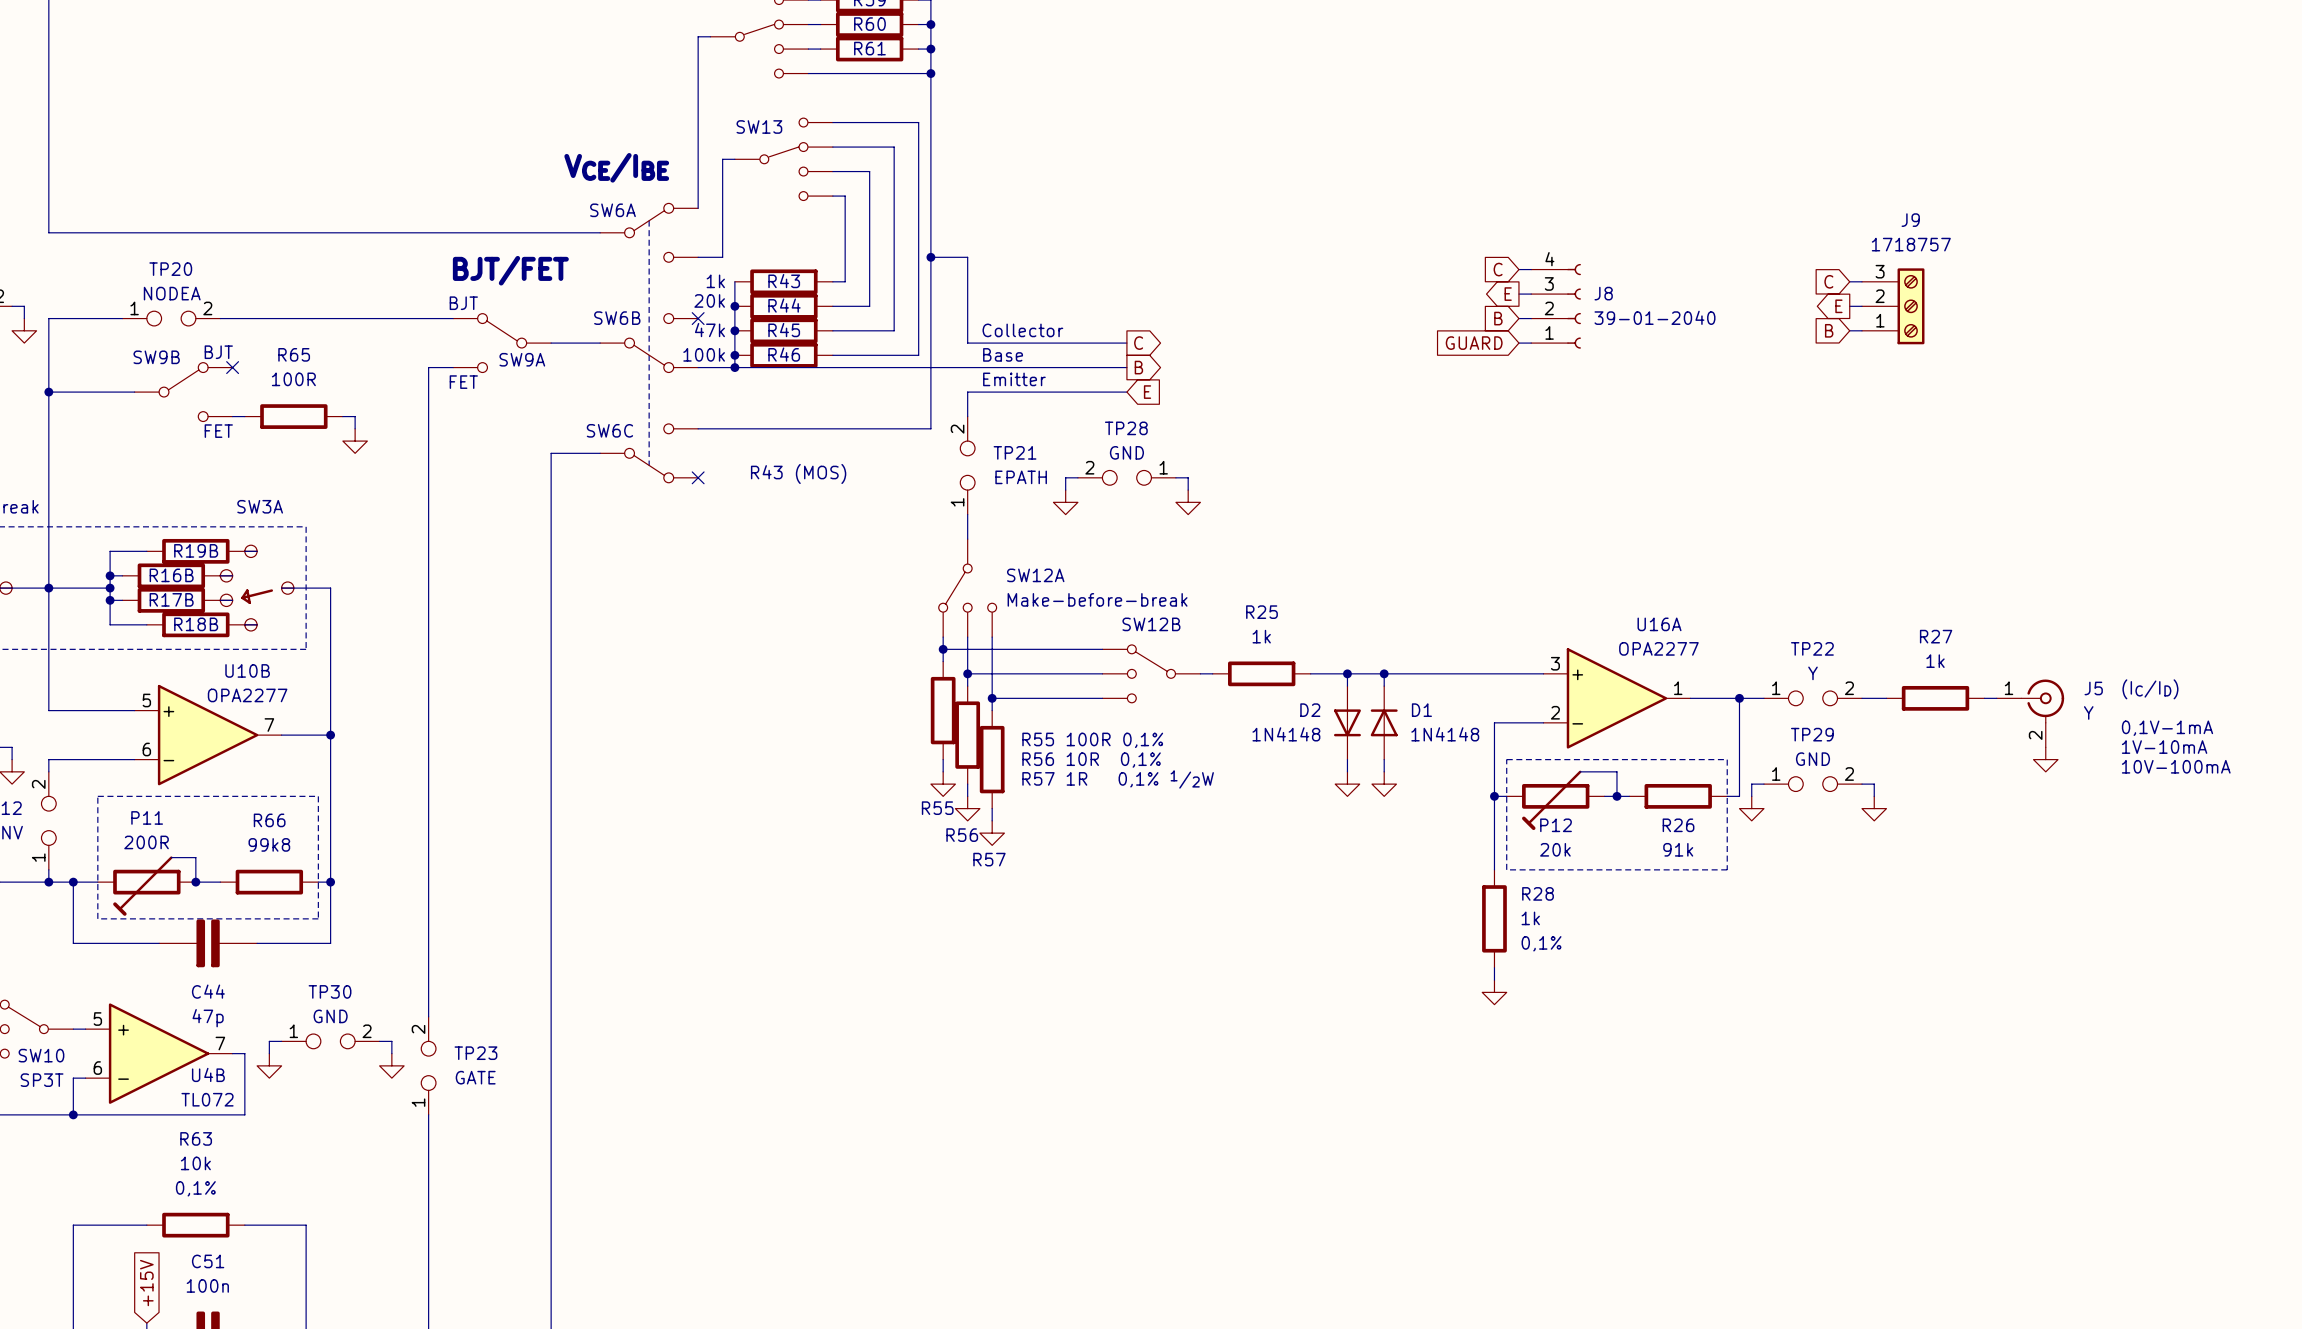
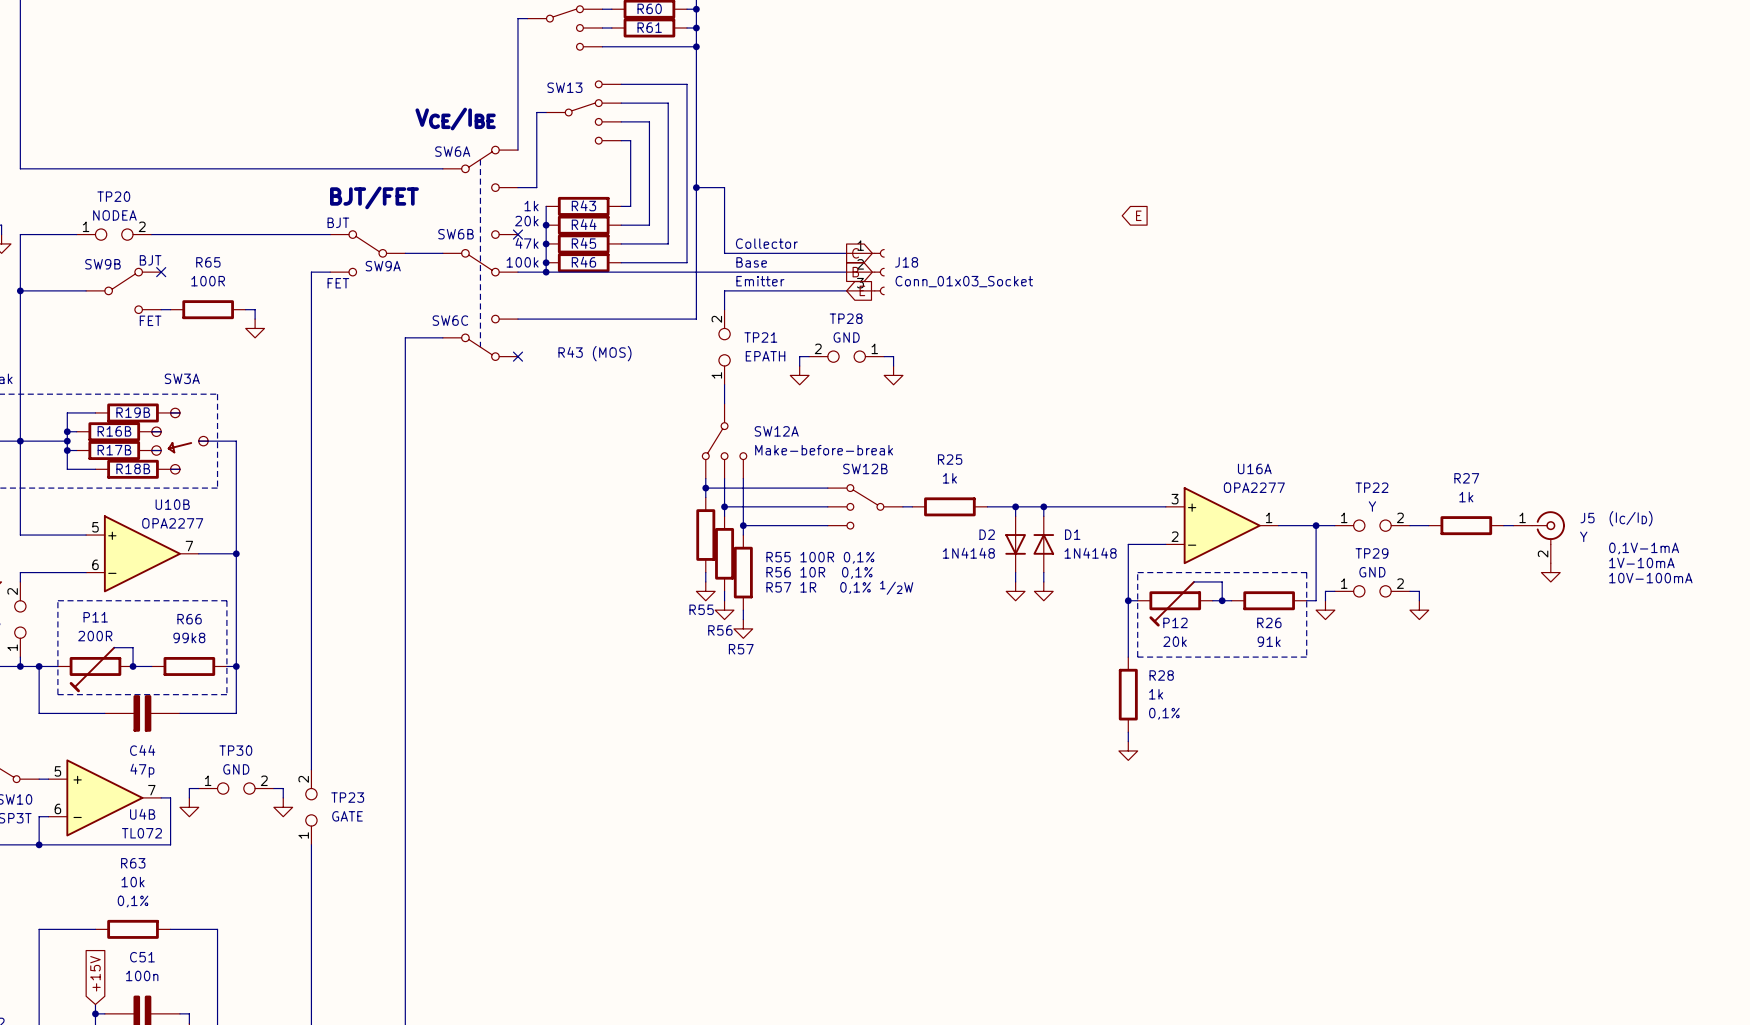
global label: C (1498, 269) -> none
wire: (1518, 269) (1531, 269) -> none
global label: C (1828, 281) -> none
wire: (1849, 281) (1862, 281) -> none
wire: (1518, 294) (1531, 294) -> none
J8: 39-01-2040 (1556, 306) -> none
global label: E (1838, 306) -> none
wire: (1849, 306) (1862, 306) -> none
J9: 1718757 (1893, 306) -> none
global label: B (1498, 318) -> none
wire: (1518, 318) (1531, 318) -> none
global label: B (1829, 330) -> none
wire: (1849, 330) (1862, 330) -> none
global label: GUARD (1474, 343) -> none
wire: (1518, 343) (1531, 343) -> none
J18: none -> Conn_01x03_Socket (865, 272)

